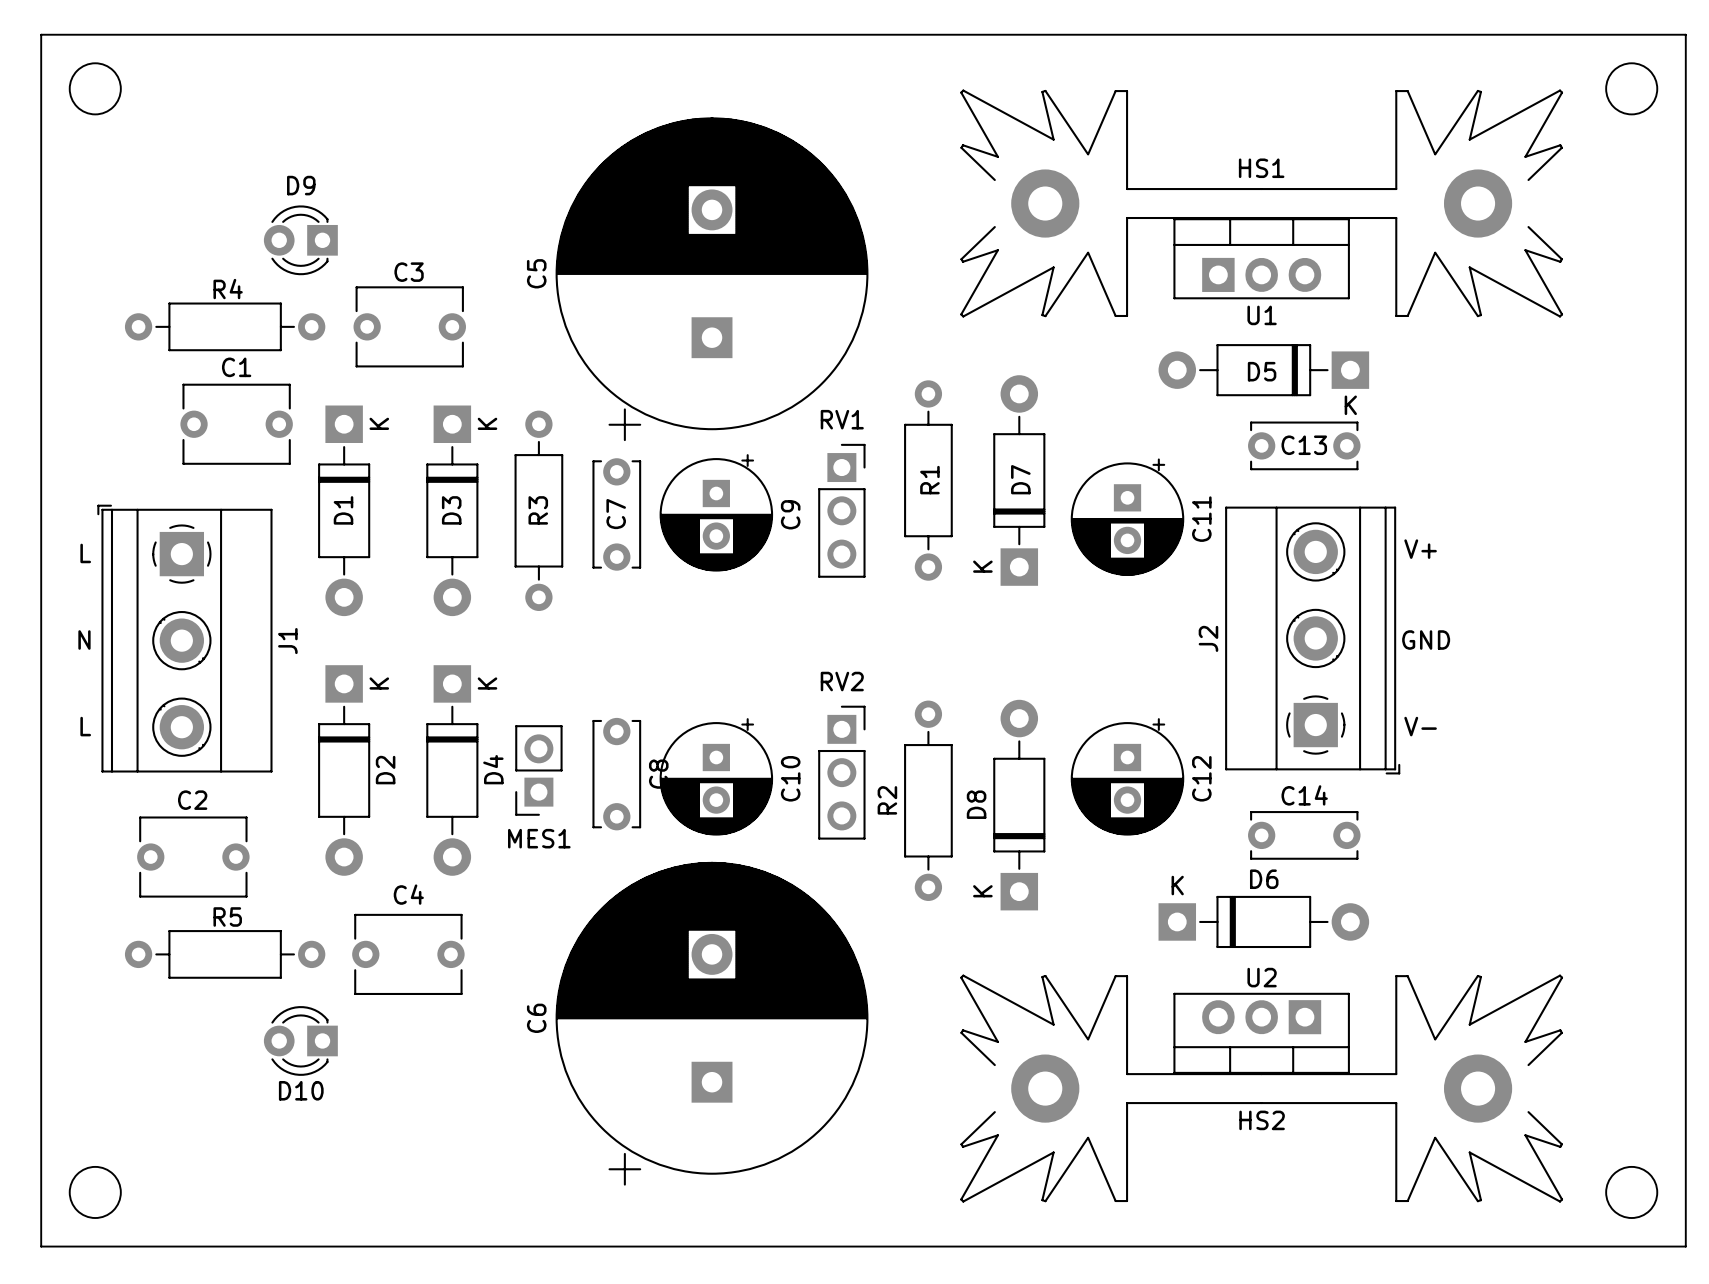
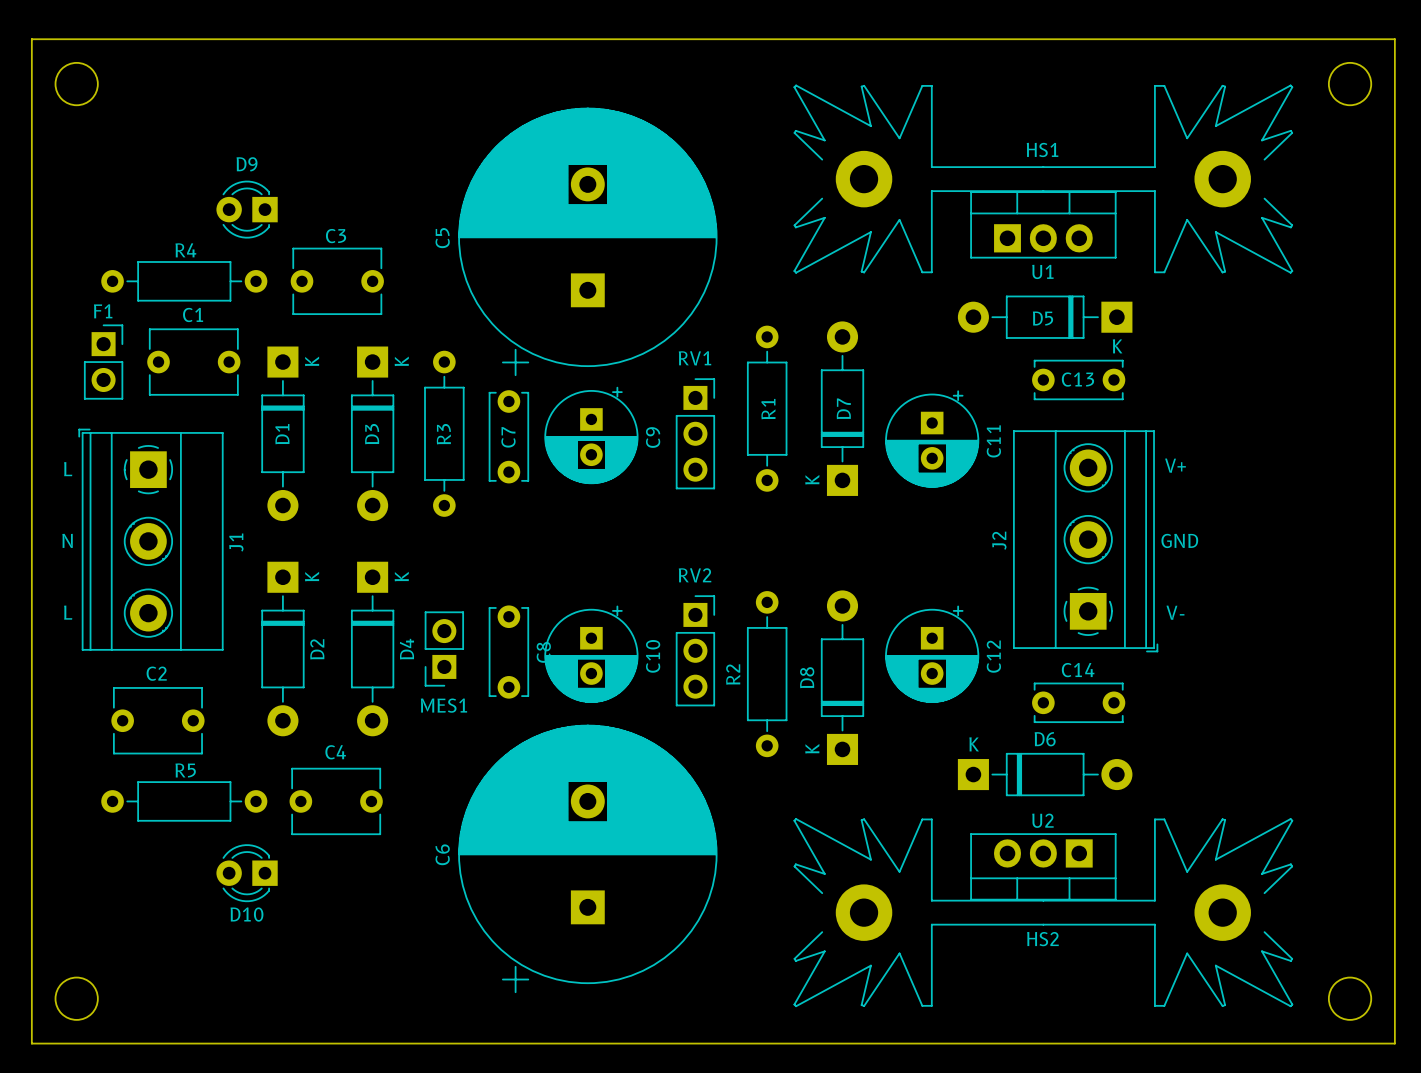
F1: none -> (103, 362)

